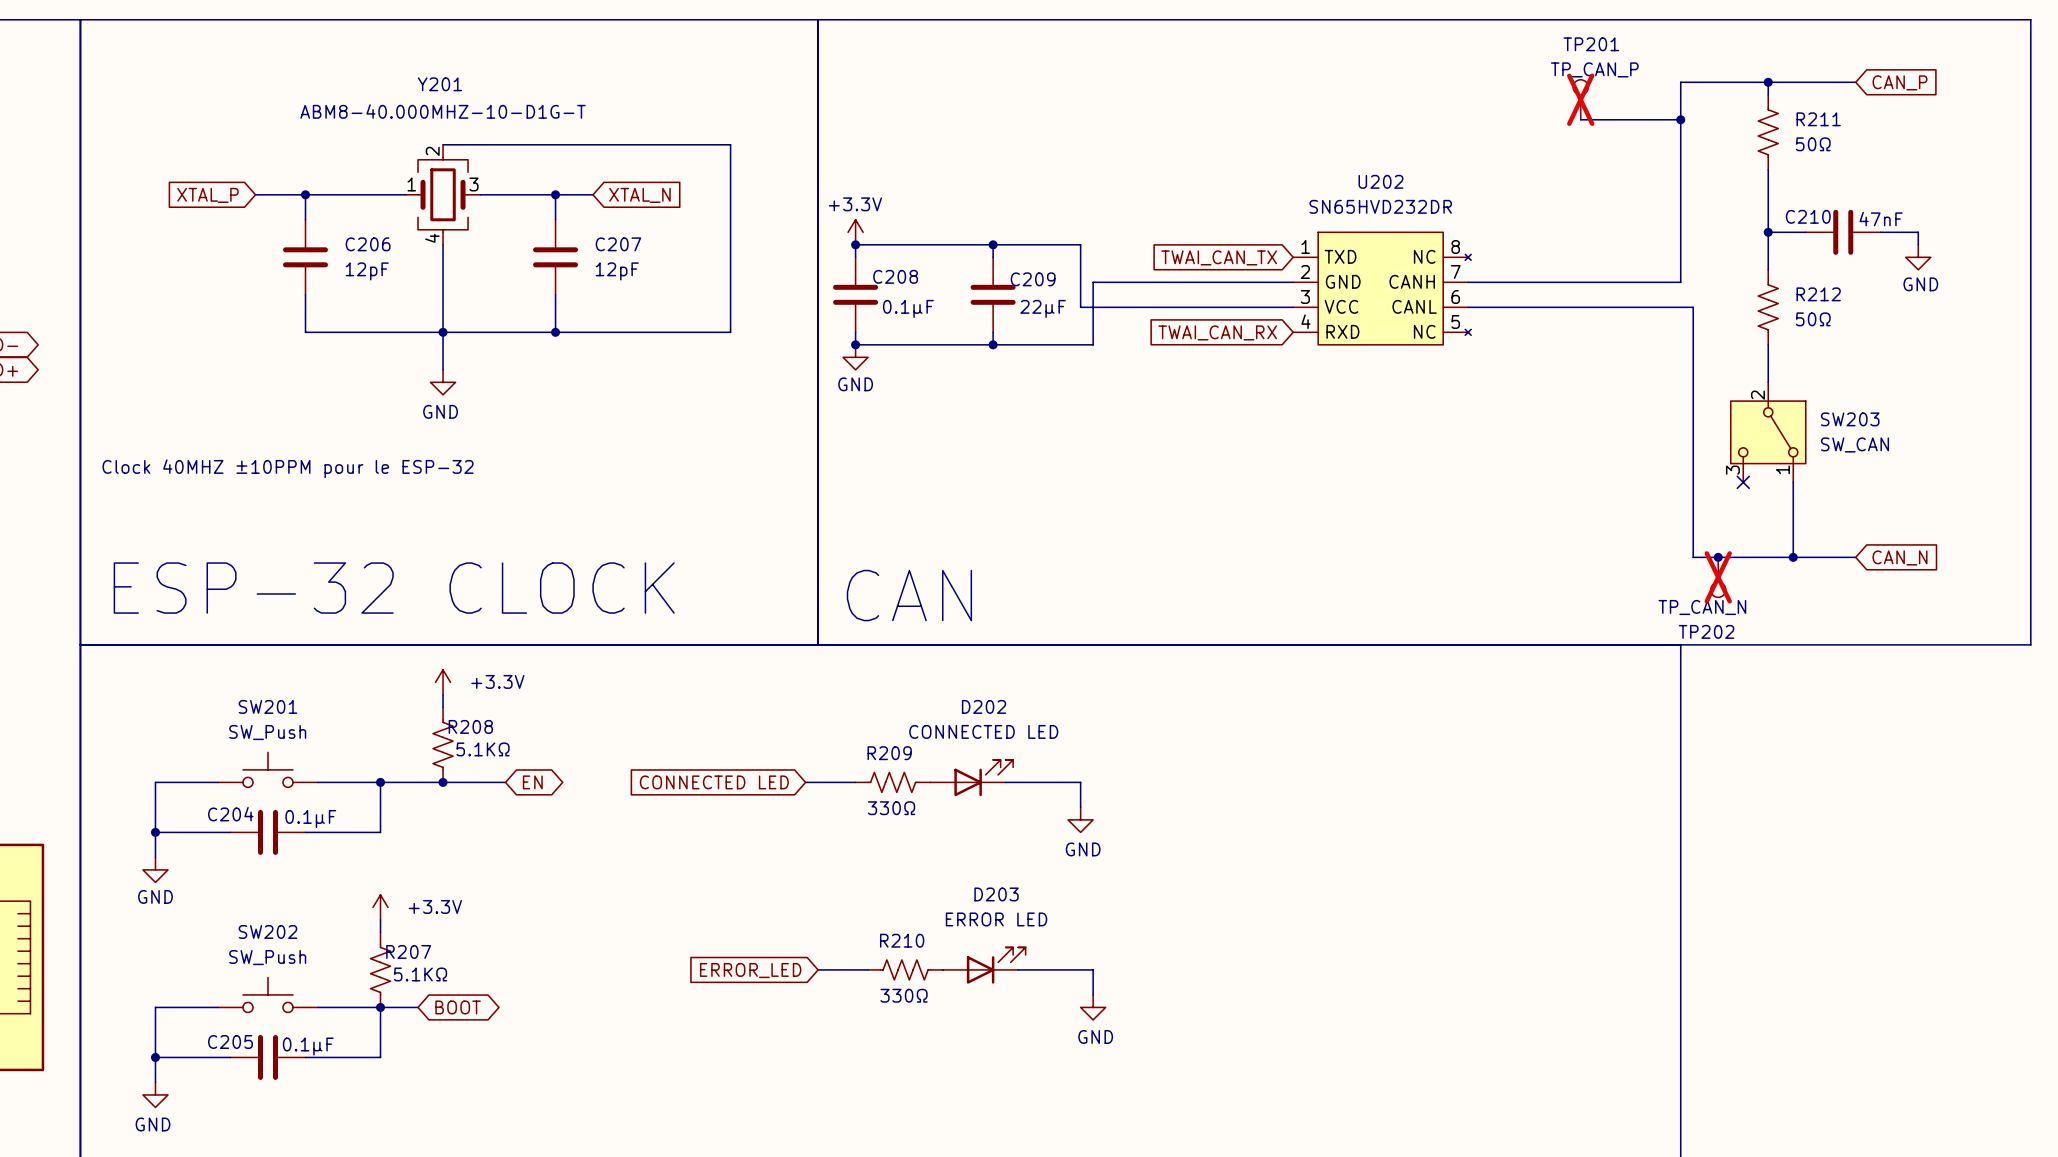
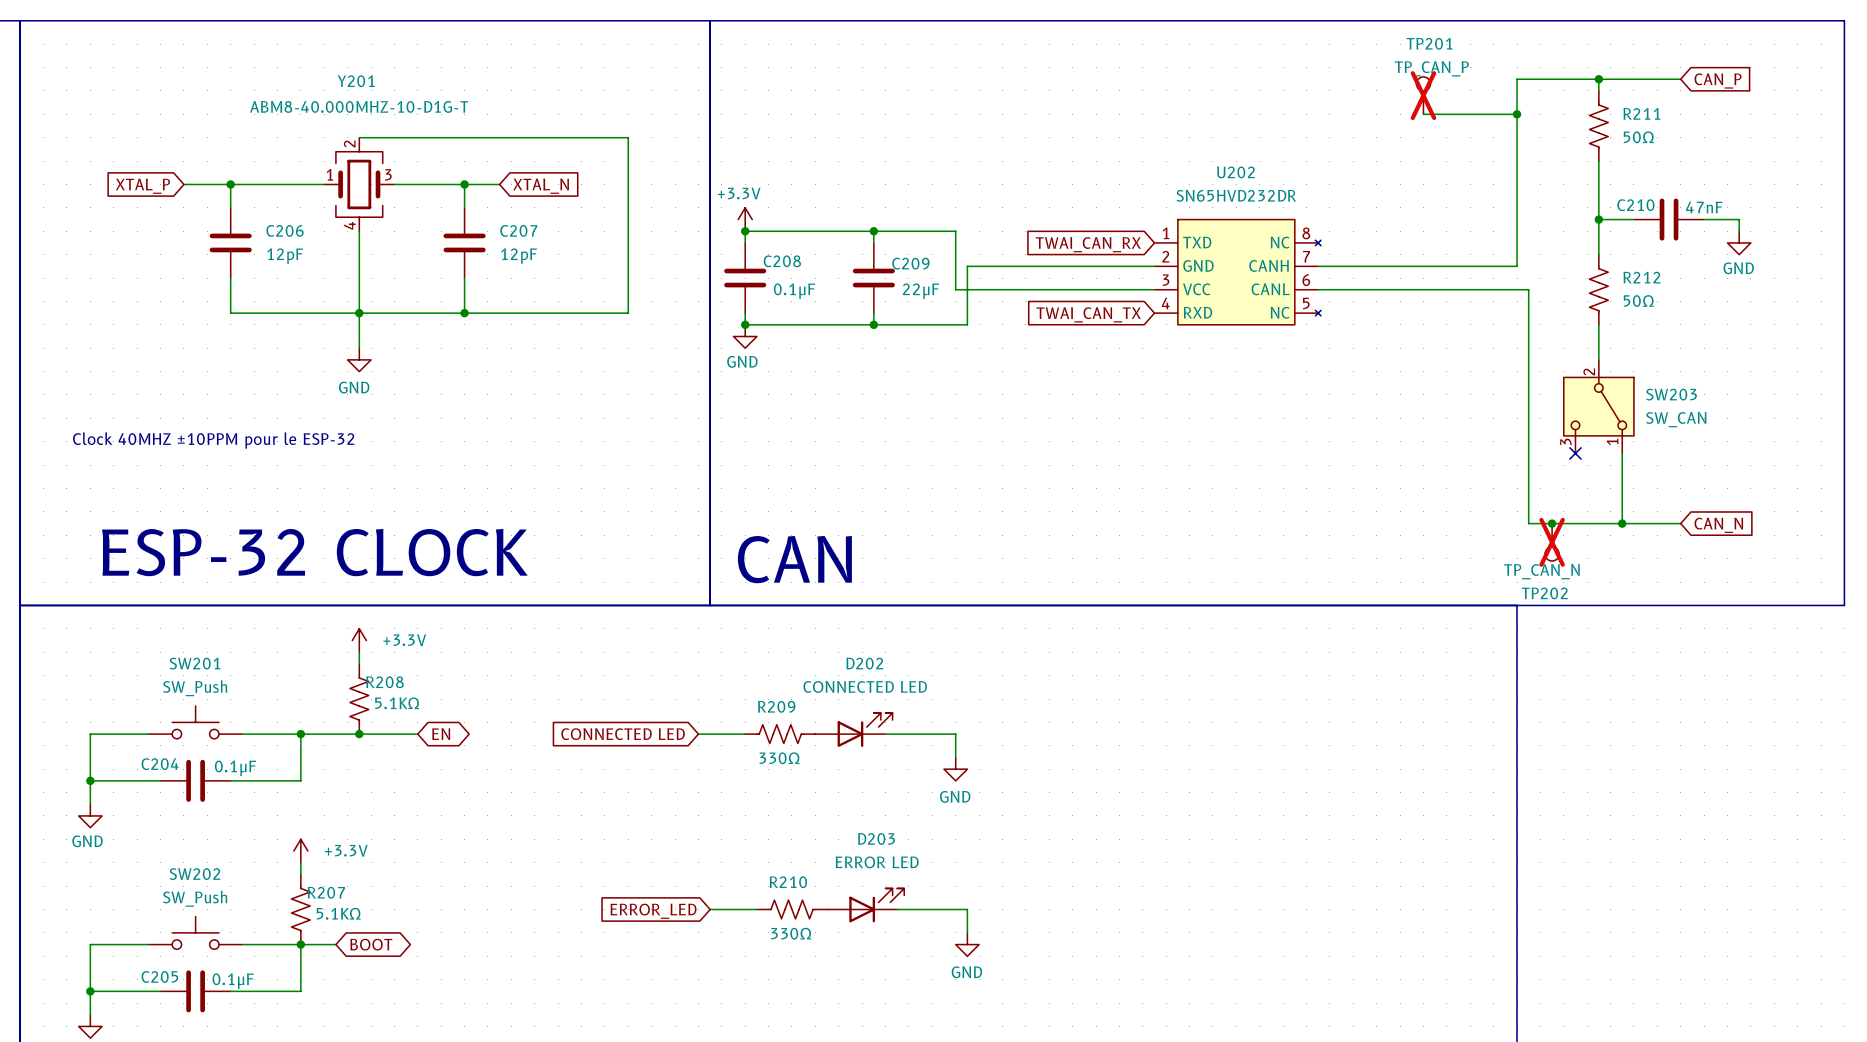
global label: TWAI_CAN_TX (1219, 257) -> TWAI_CAN_RX (1088, 244)
global label: TWAI_CAN_RX (1217, 332) -> TWAI_CAN_TX (1088, 314)

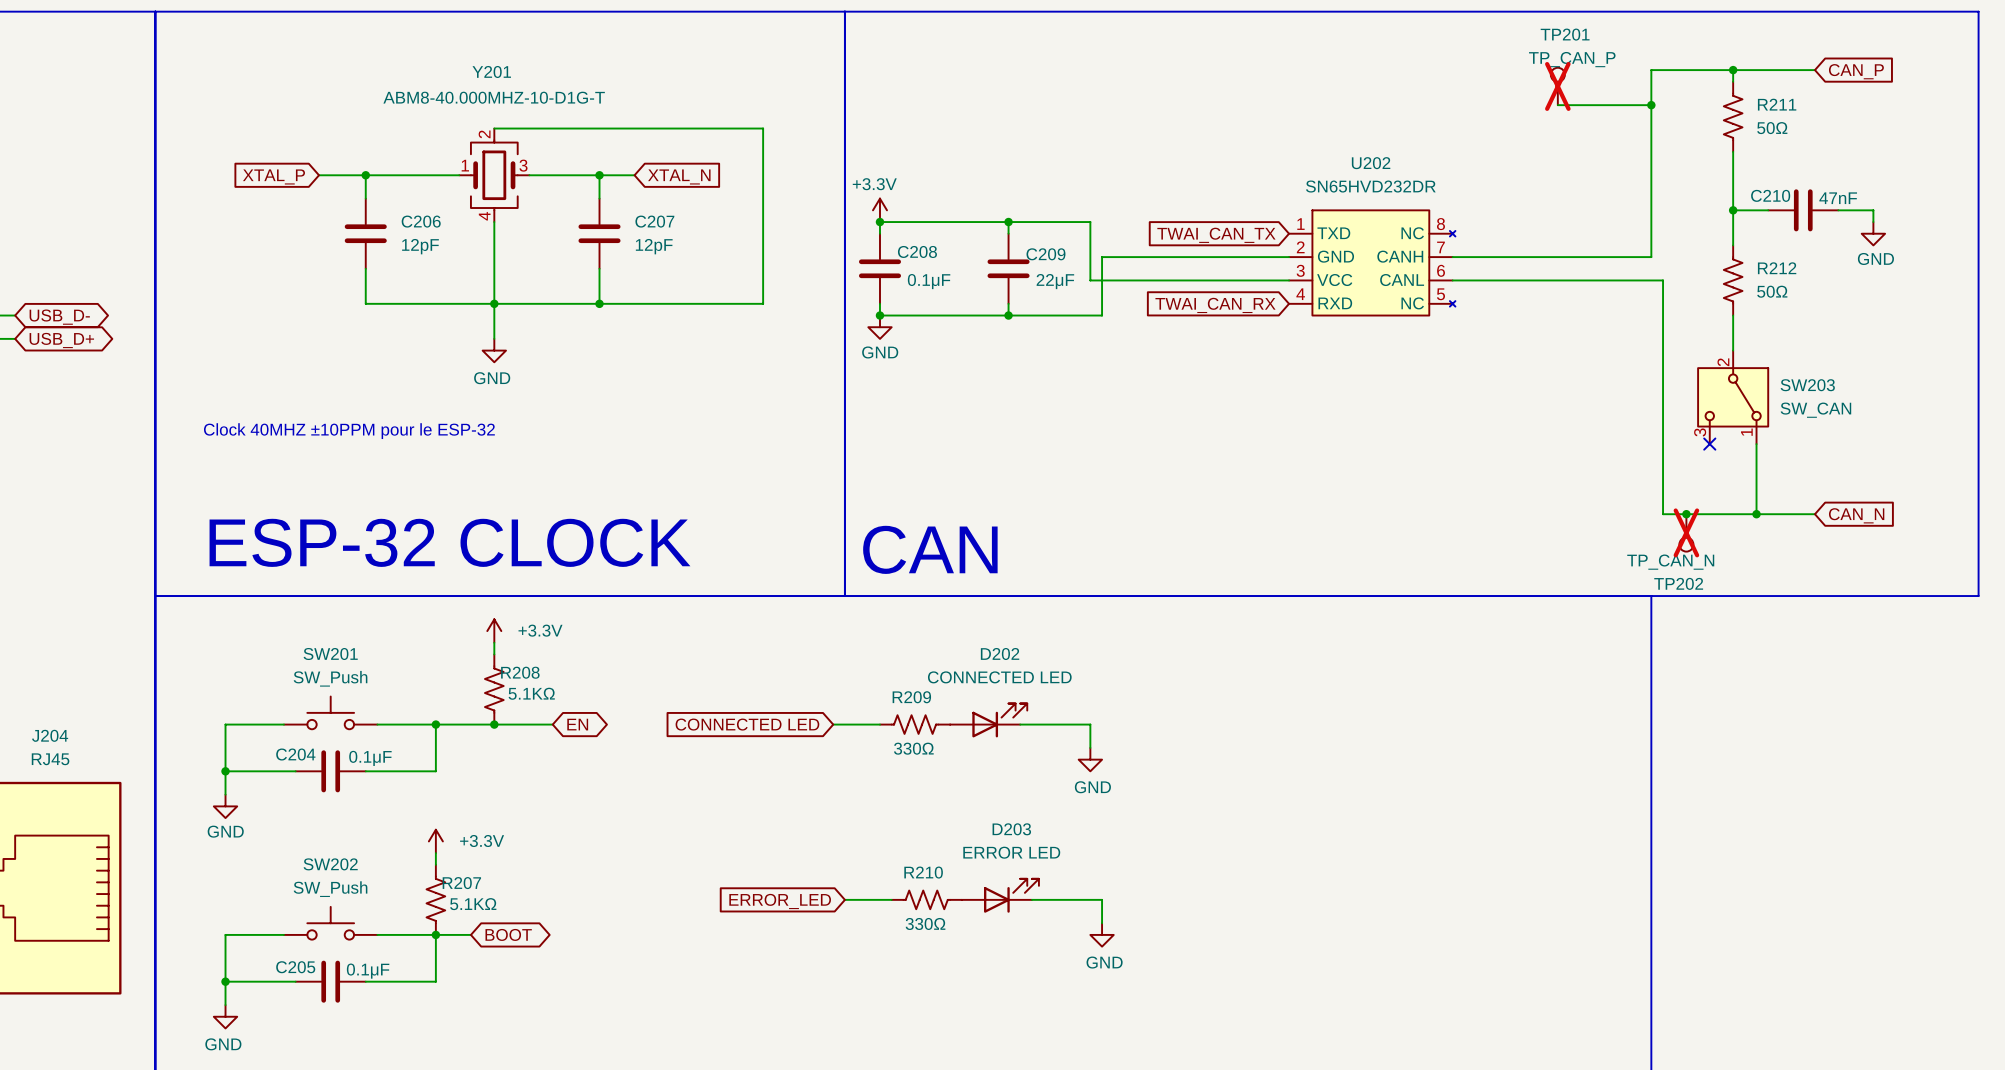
global label: TWAI_CAN_RX (1088, 244) -> TWAI_CAN_TX (1216, 235)
global label: TWAI_CAN_TX (1088, 314) -> TWAI_CAN_RX (1215, 305)

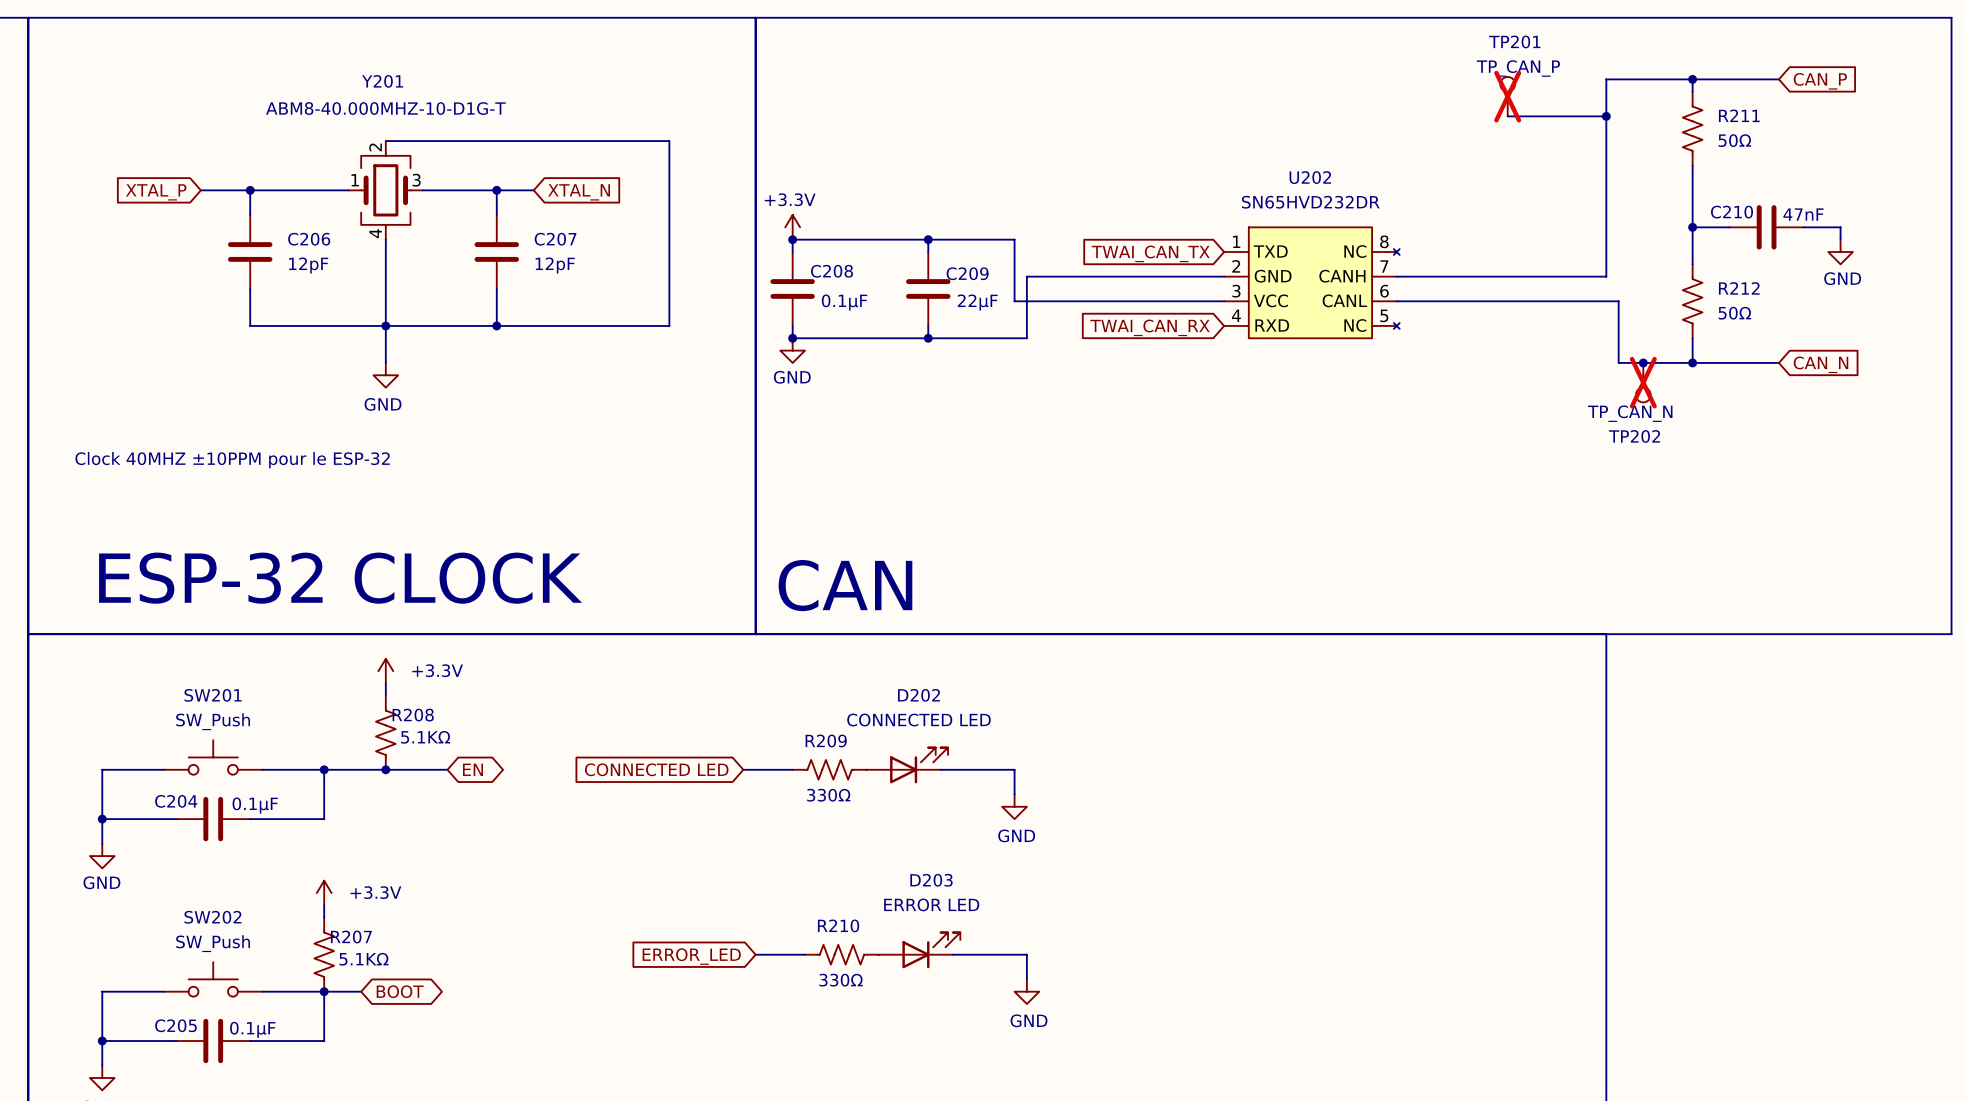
wire: (1663, 338) (1663, 514) (1814, 514) -> (1618, 362) (1778, 362)
junction: none -> (1643, 362)
wire: (1733, 338) (1733, 350) -> none
junction: none -> (1692, 362)
SW203: SW_CAN (1733, 397) -> none
no-connect mark: (1709, 444) -> none
wire: (1756, 444) (1756, 514) -> none
junction: (1686, 514) -> none
junction: (1756, 514) -> none
global label position: CAN_N (1856, 515) -> CAN_N (1821, 364)
TP202 position: (1686, 532) -> (1643, 382)

